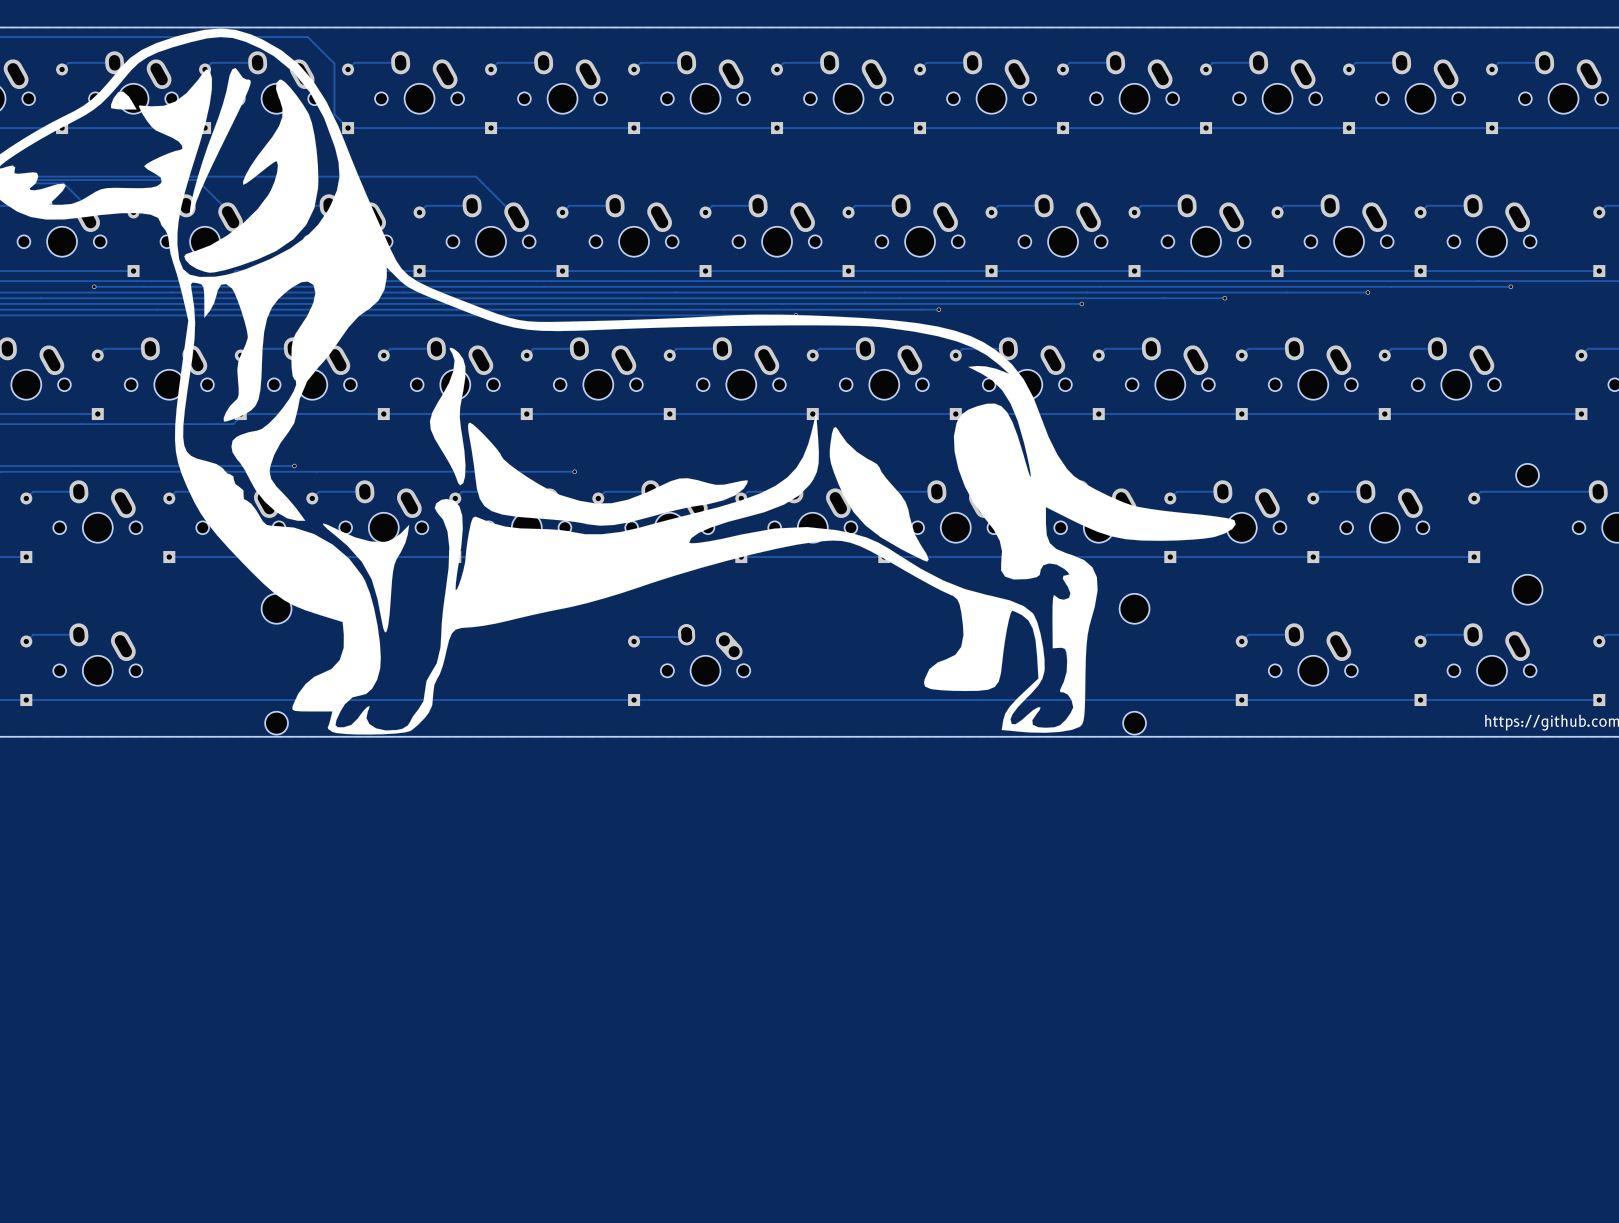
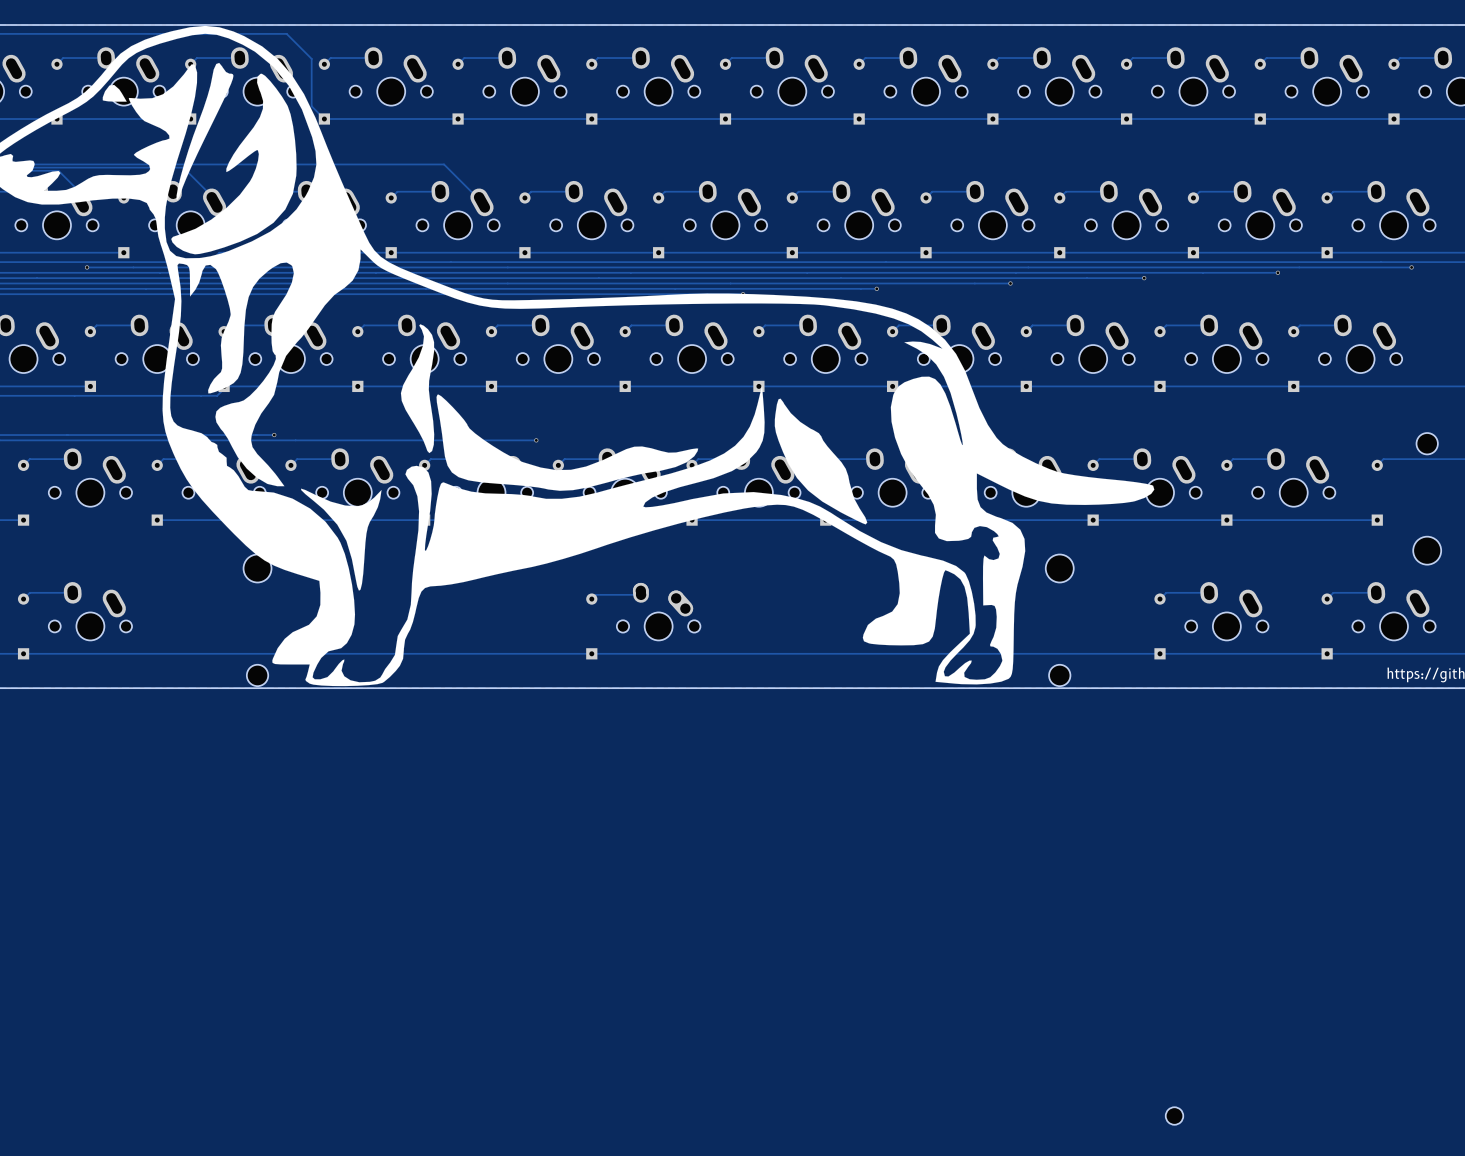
part: none -> (1174, 1116)

